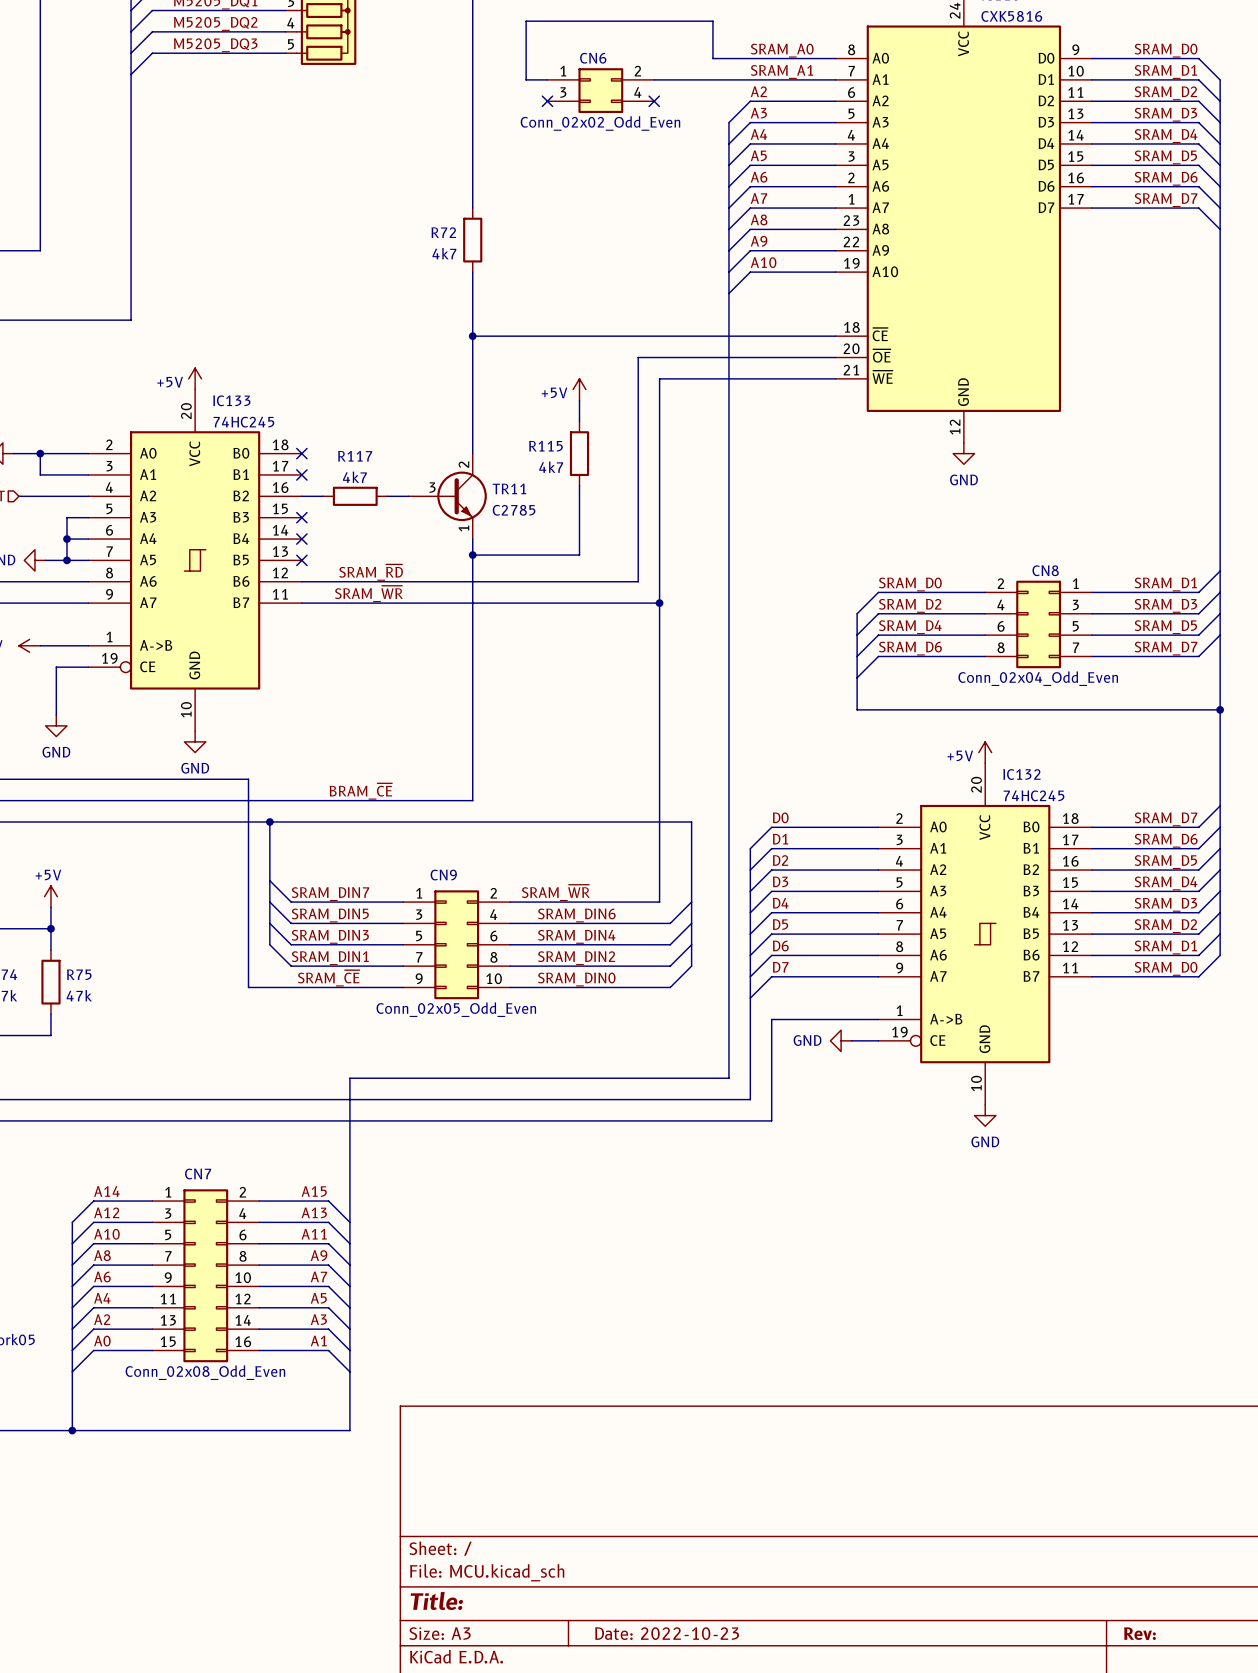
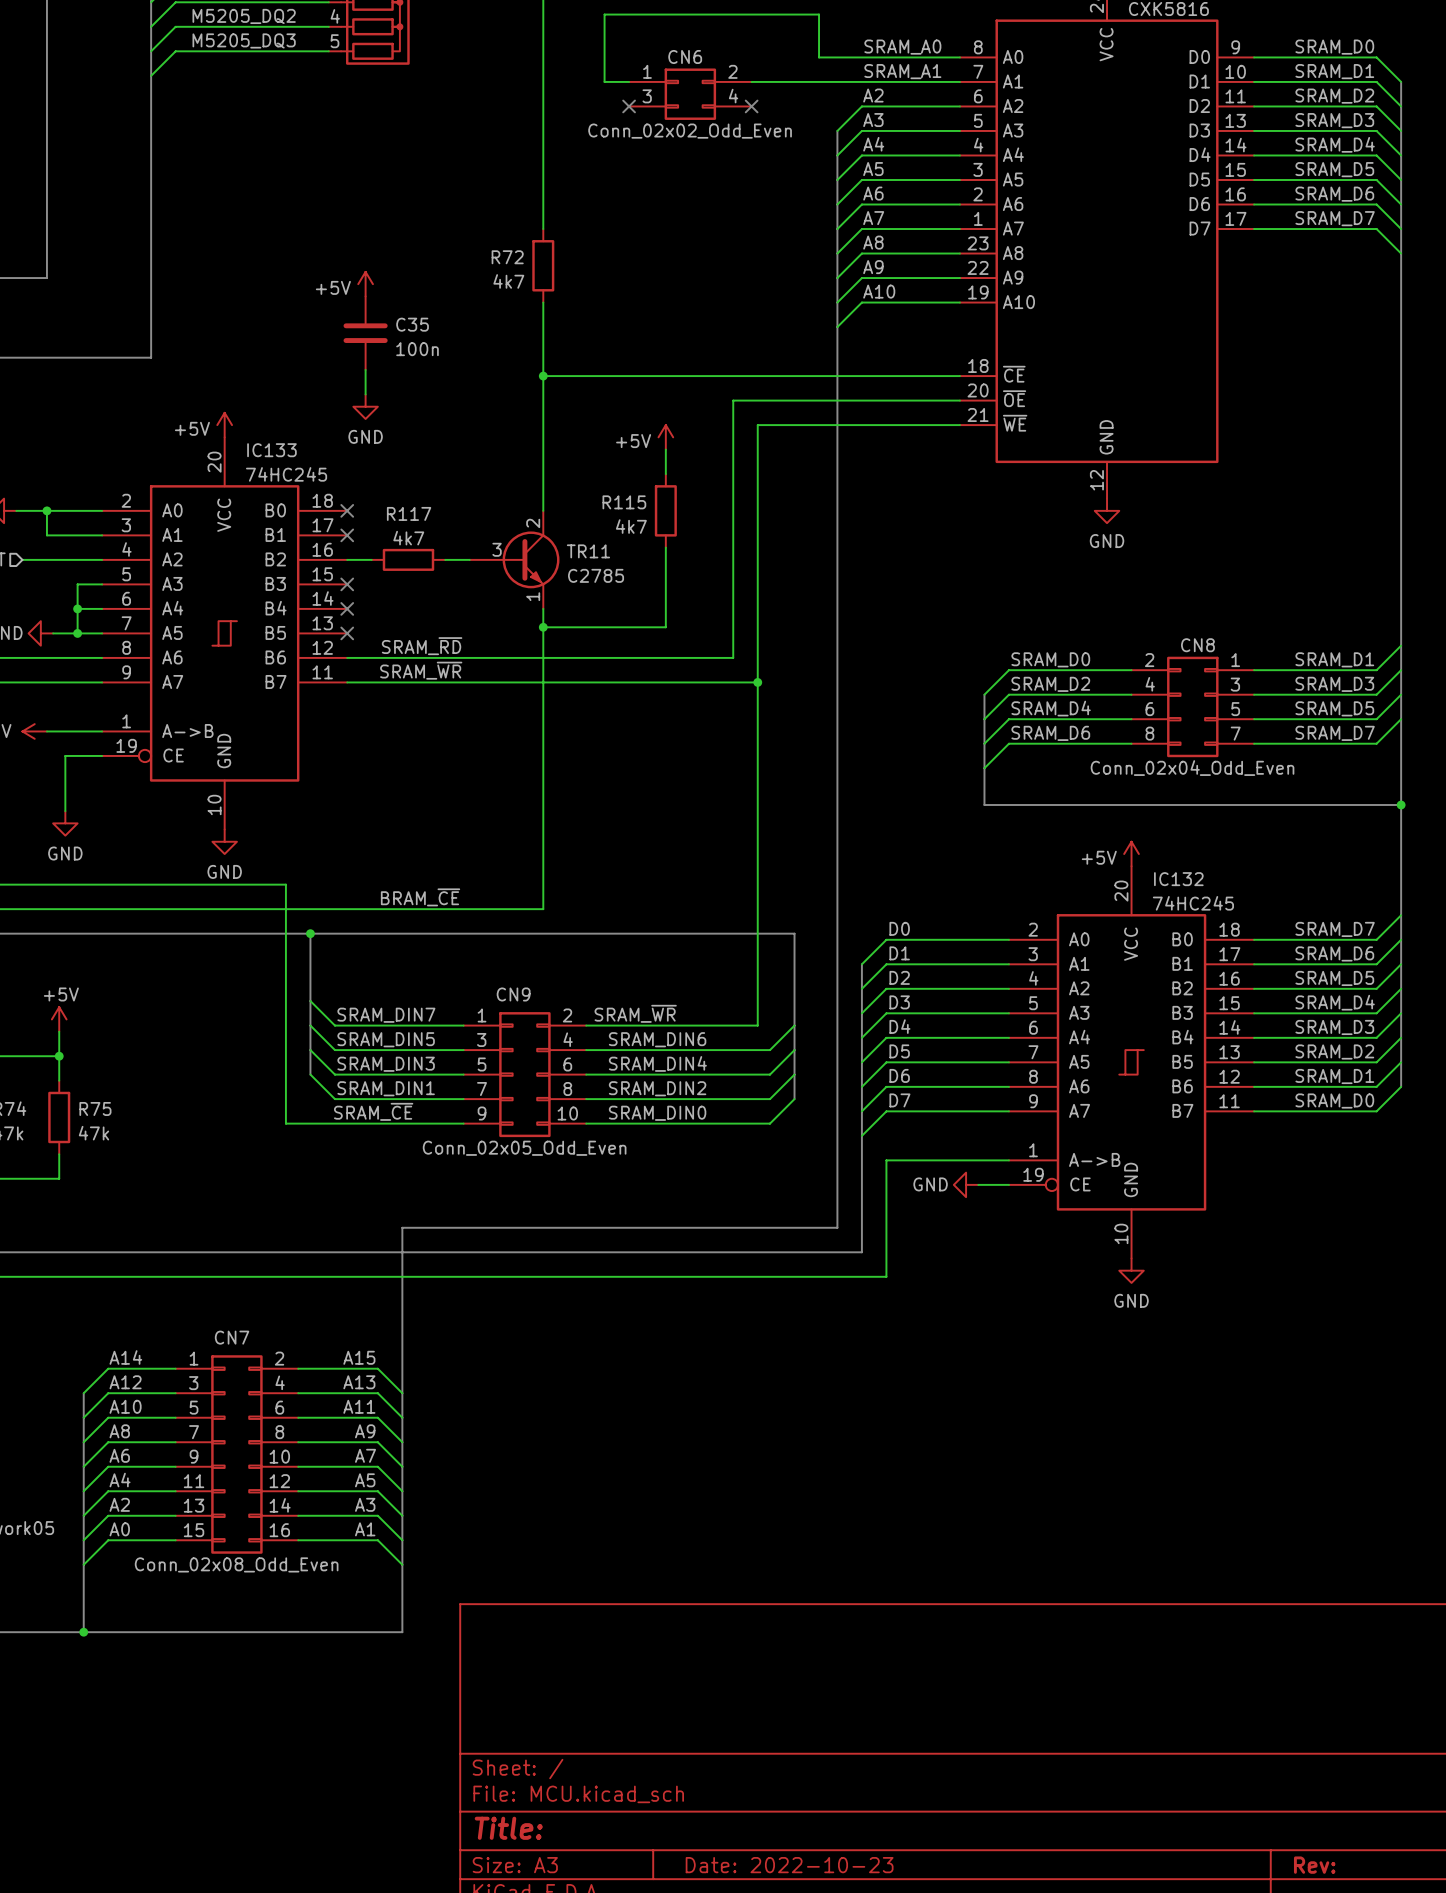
power symbol: none -> +5V (365, 284)
C35: none -> 100n (365, 333)
wire: none -> (365, 369) (365, 394)
power symbol: none -> GND (365, 406)

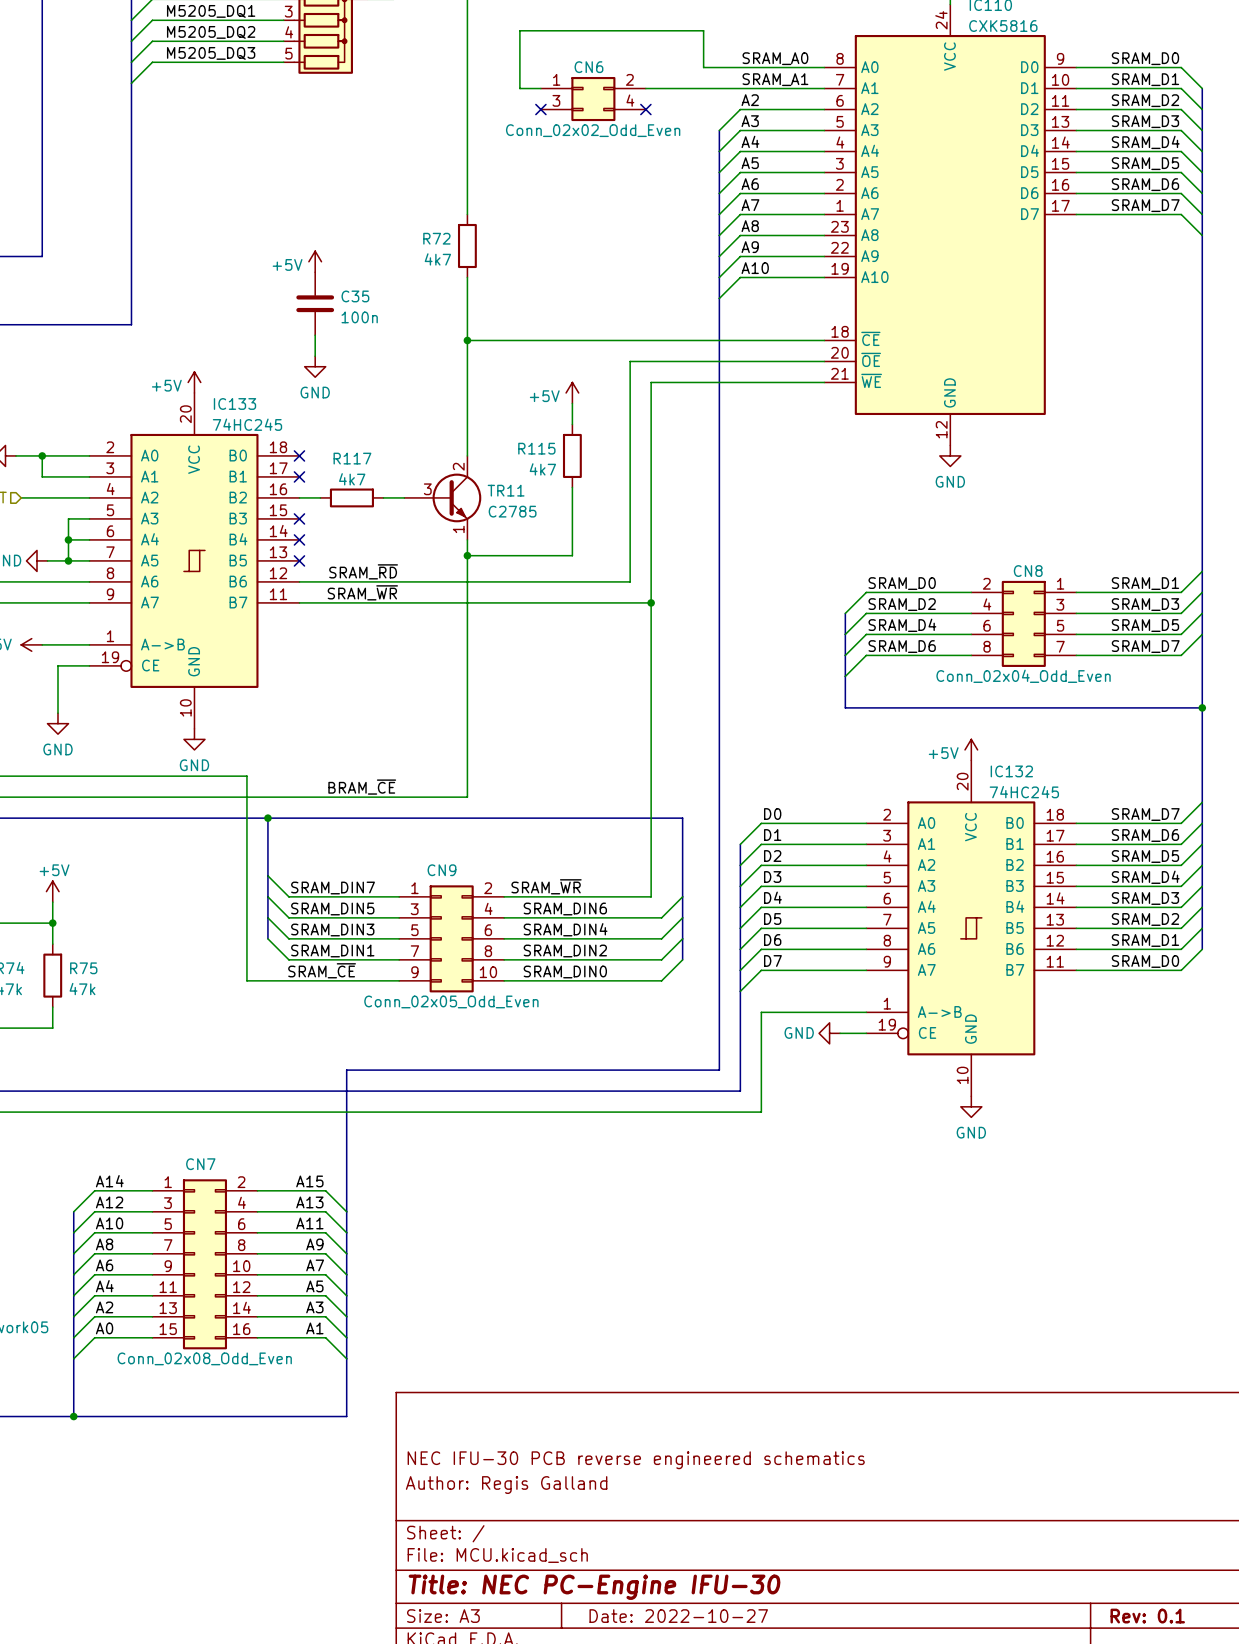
title block: none -> NEC IFU-30 PCB reverse engineered schematics (636, 1460)
title block: none -> Author: Regis Galland (506, 1485)
title block: Title: (508, 1828) -> Title: NEC PC-Engine IFU-30 (594, 1587)
title block: Date: 2022-10-23 (789, 1865) -> Date: 2022-10-27 (678, 1616)
title block: Rev: (1314, 1865) -> Rev: 0.1 (1147, 1616)

